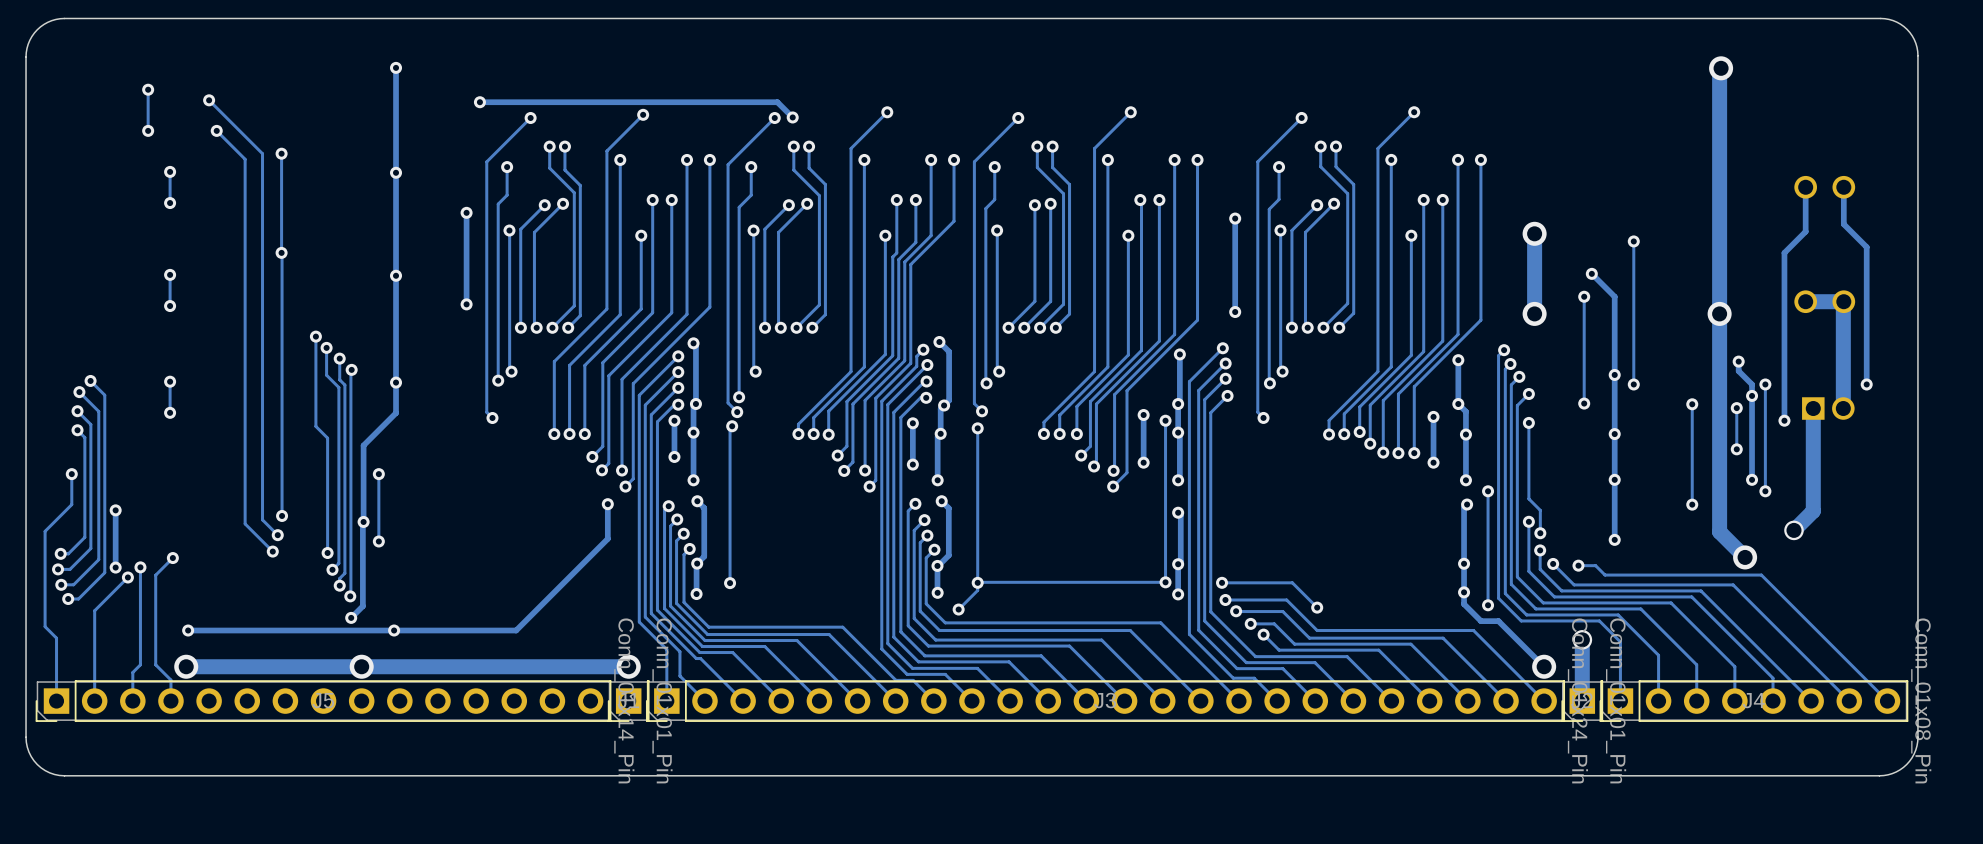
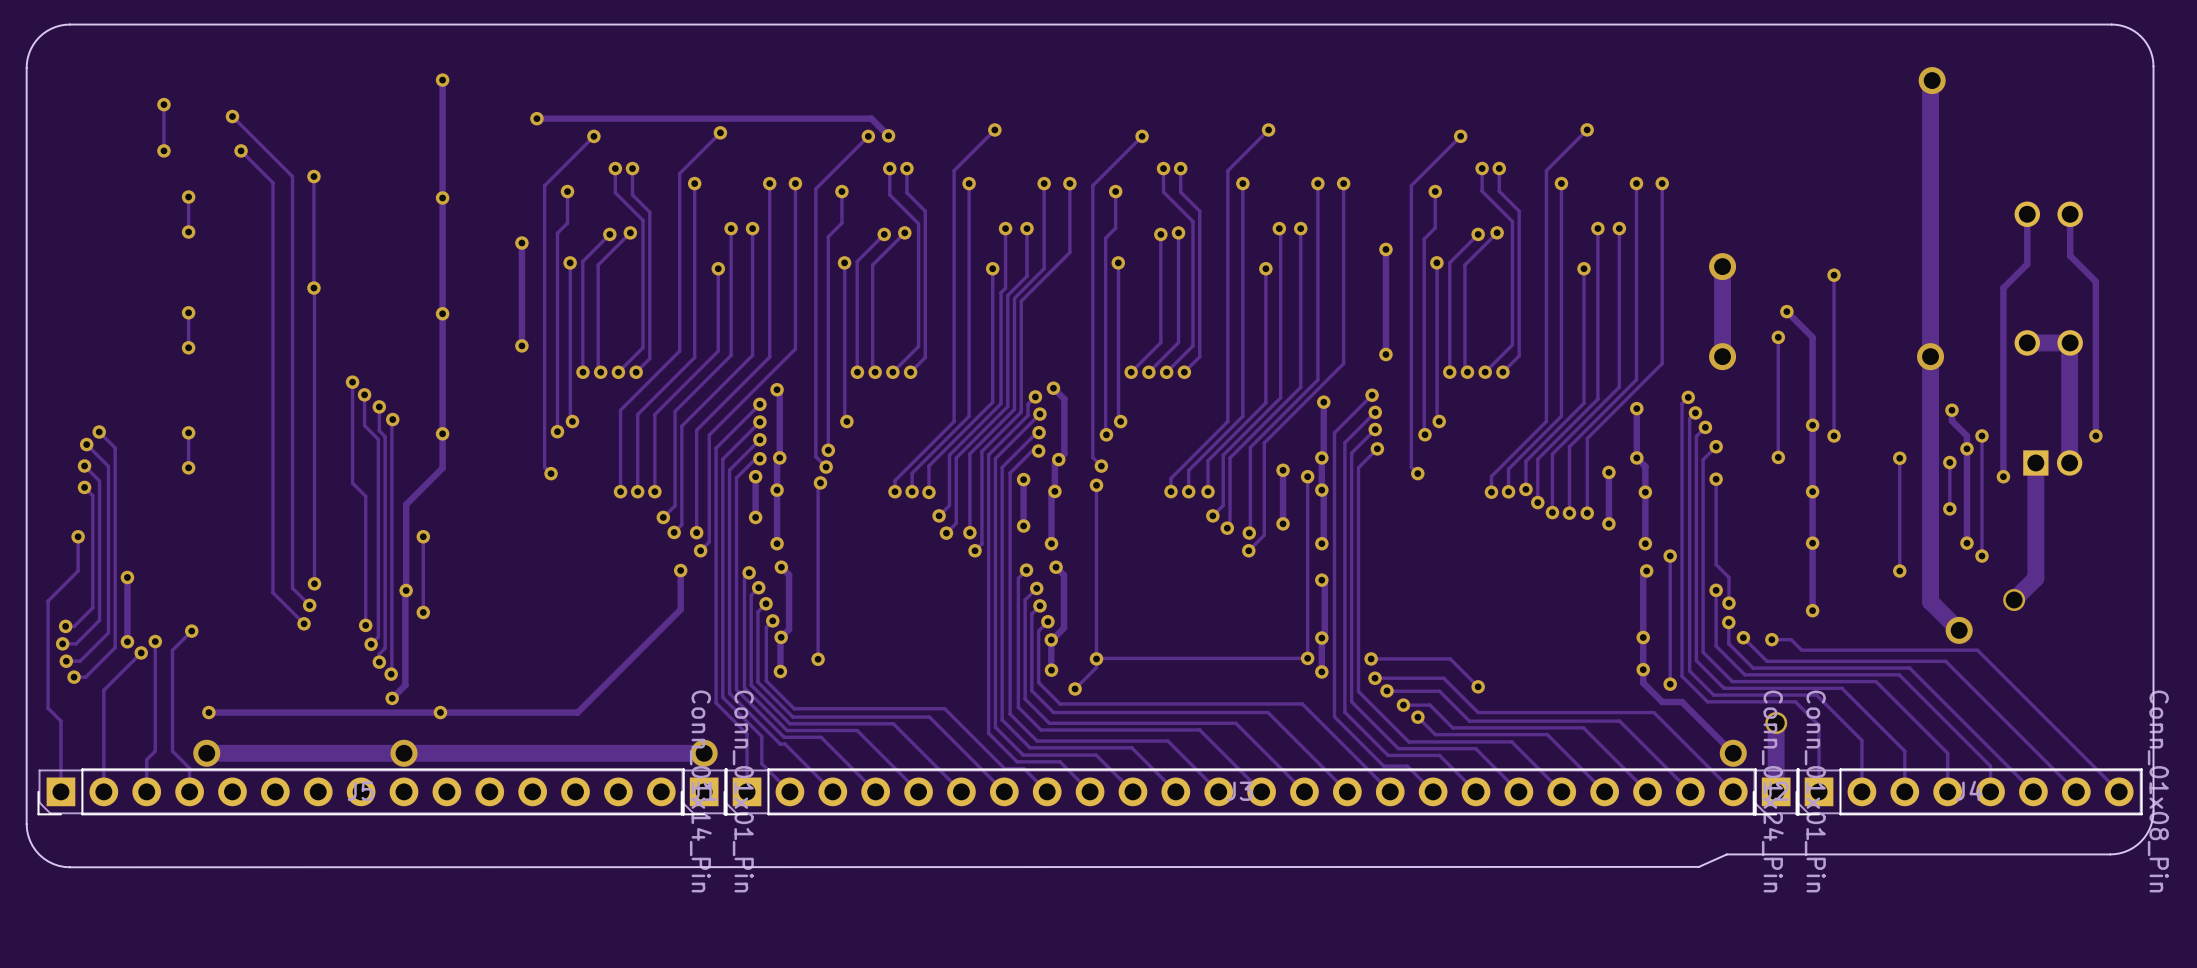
board edge: (1917, 718) (1917, 741) (1912, 757) (1896, 771) (1879, 775) (64, 775) (45, 770) (33, 760) (27, 747) (26, 729) -> (2153, 811) (2149, 829) (2140, 841) (2129, 850) (2115, 854) (1726, 854) (1698, 866) (69, 867) (53, 864) (39, 854) (29, 840) (26, 824)

